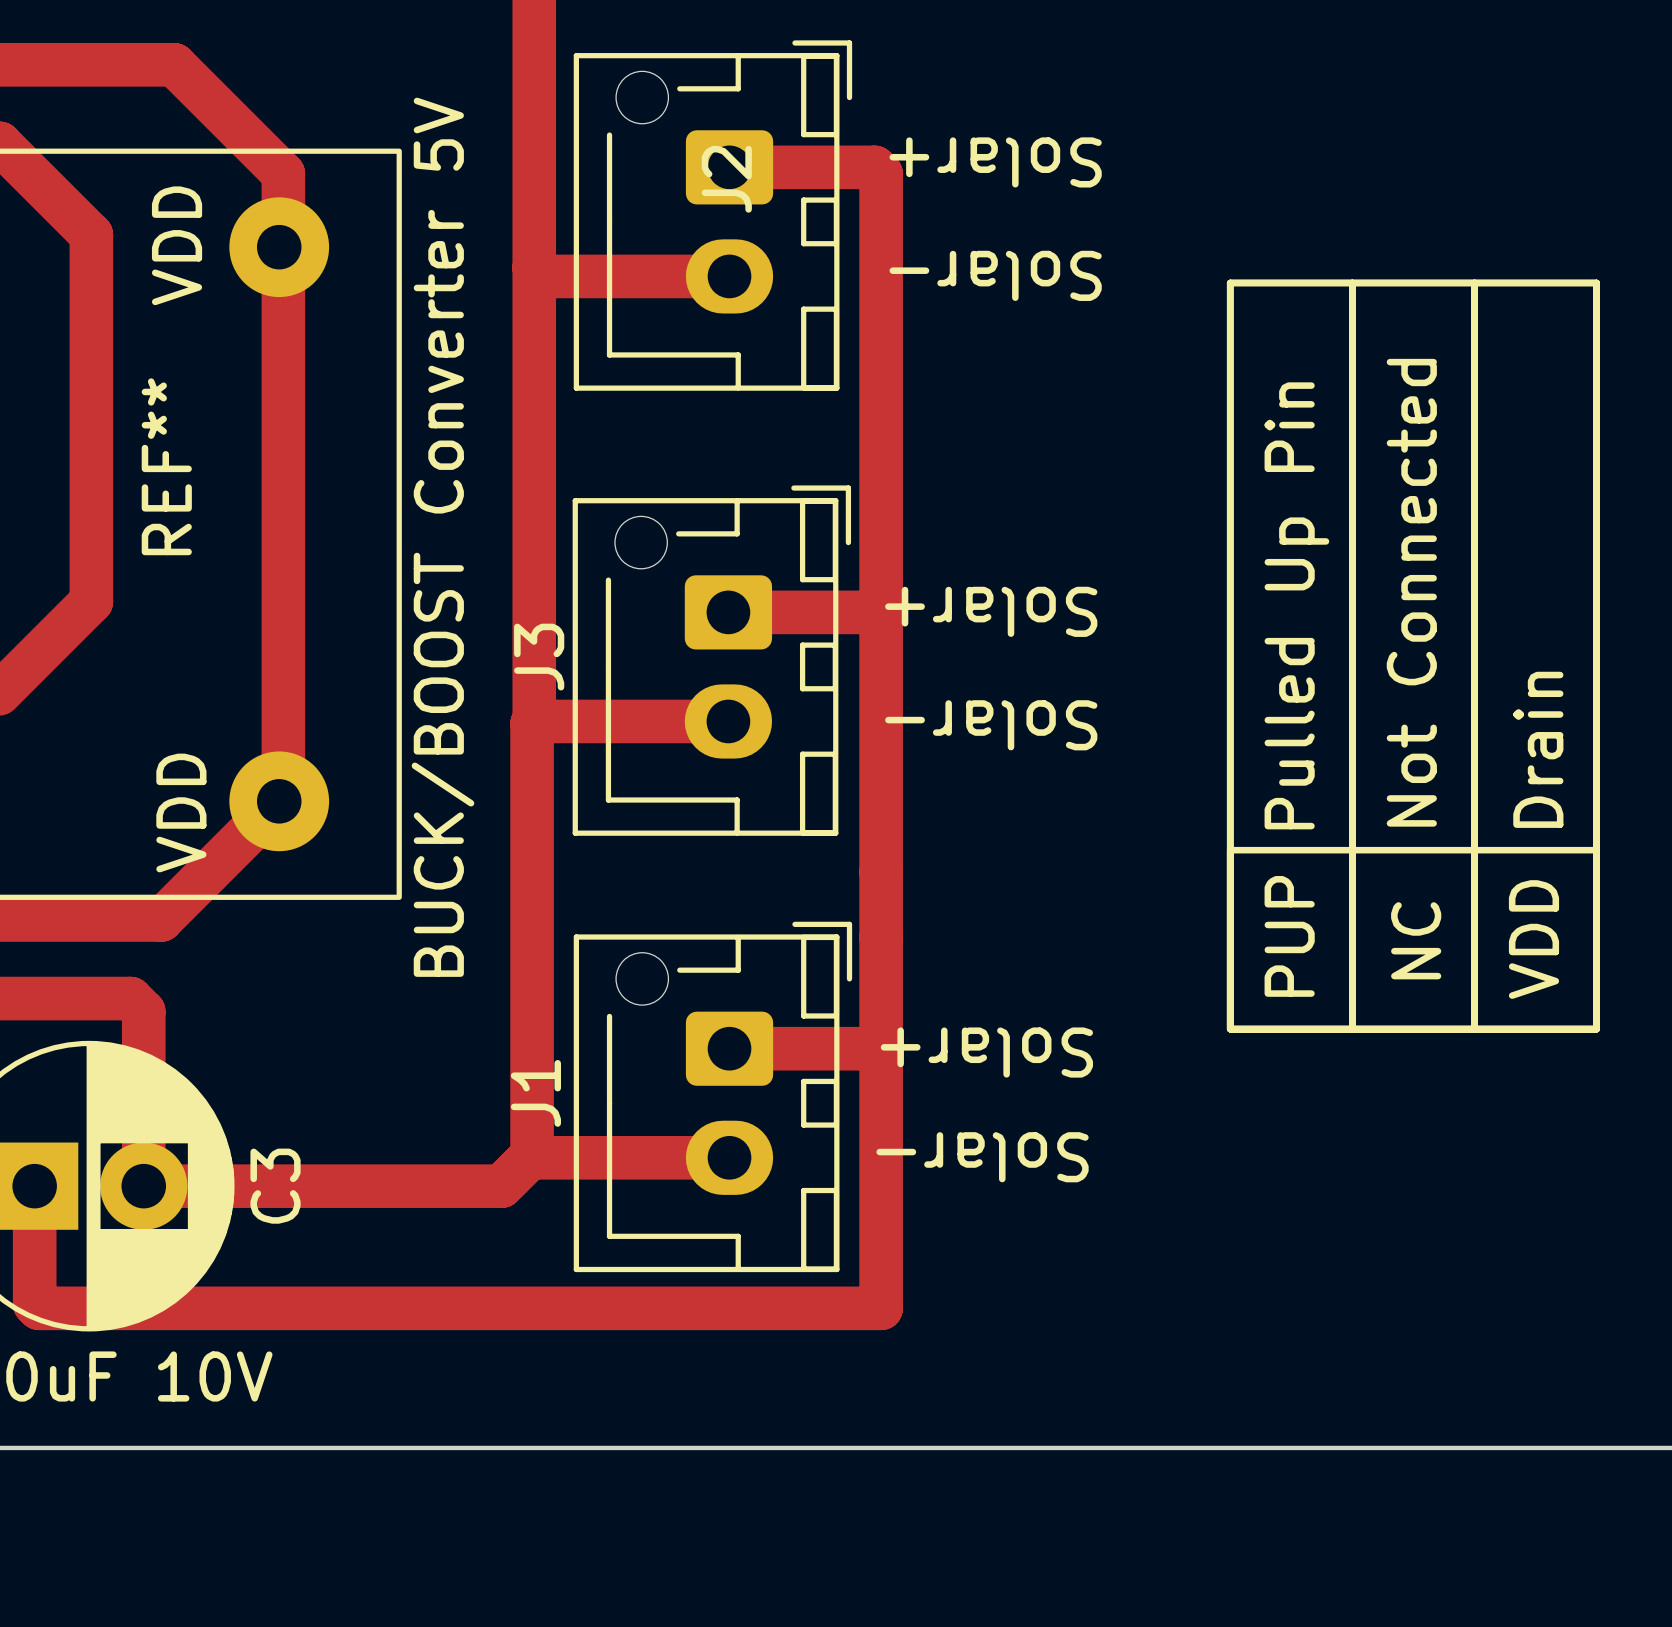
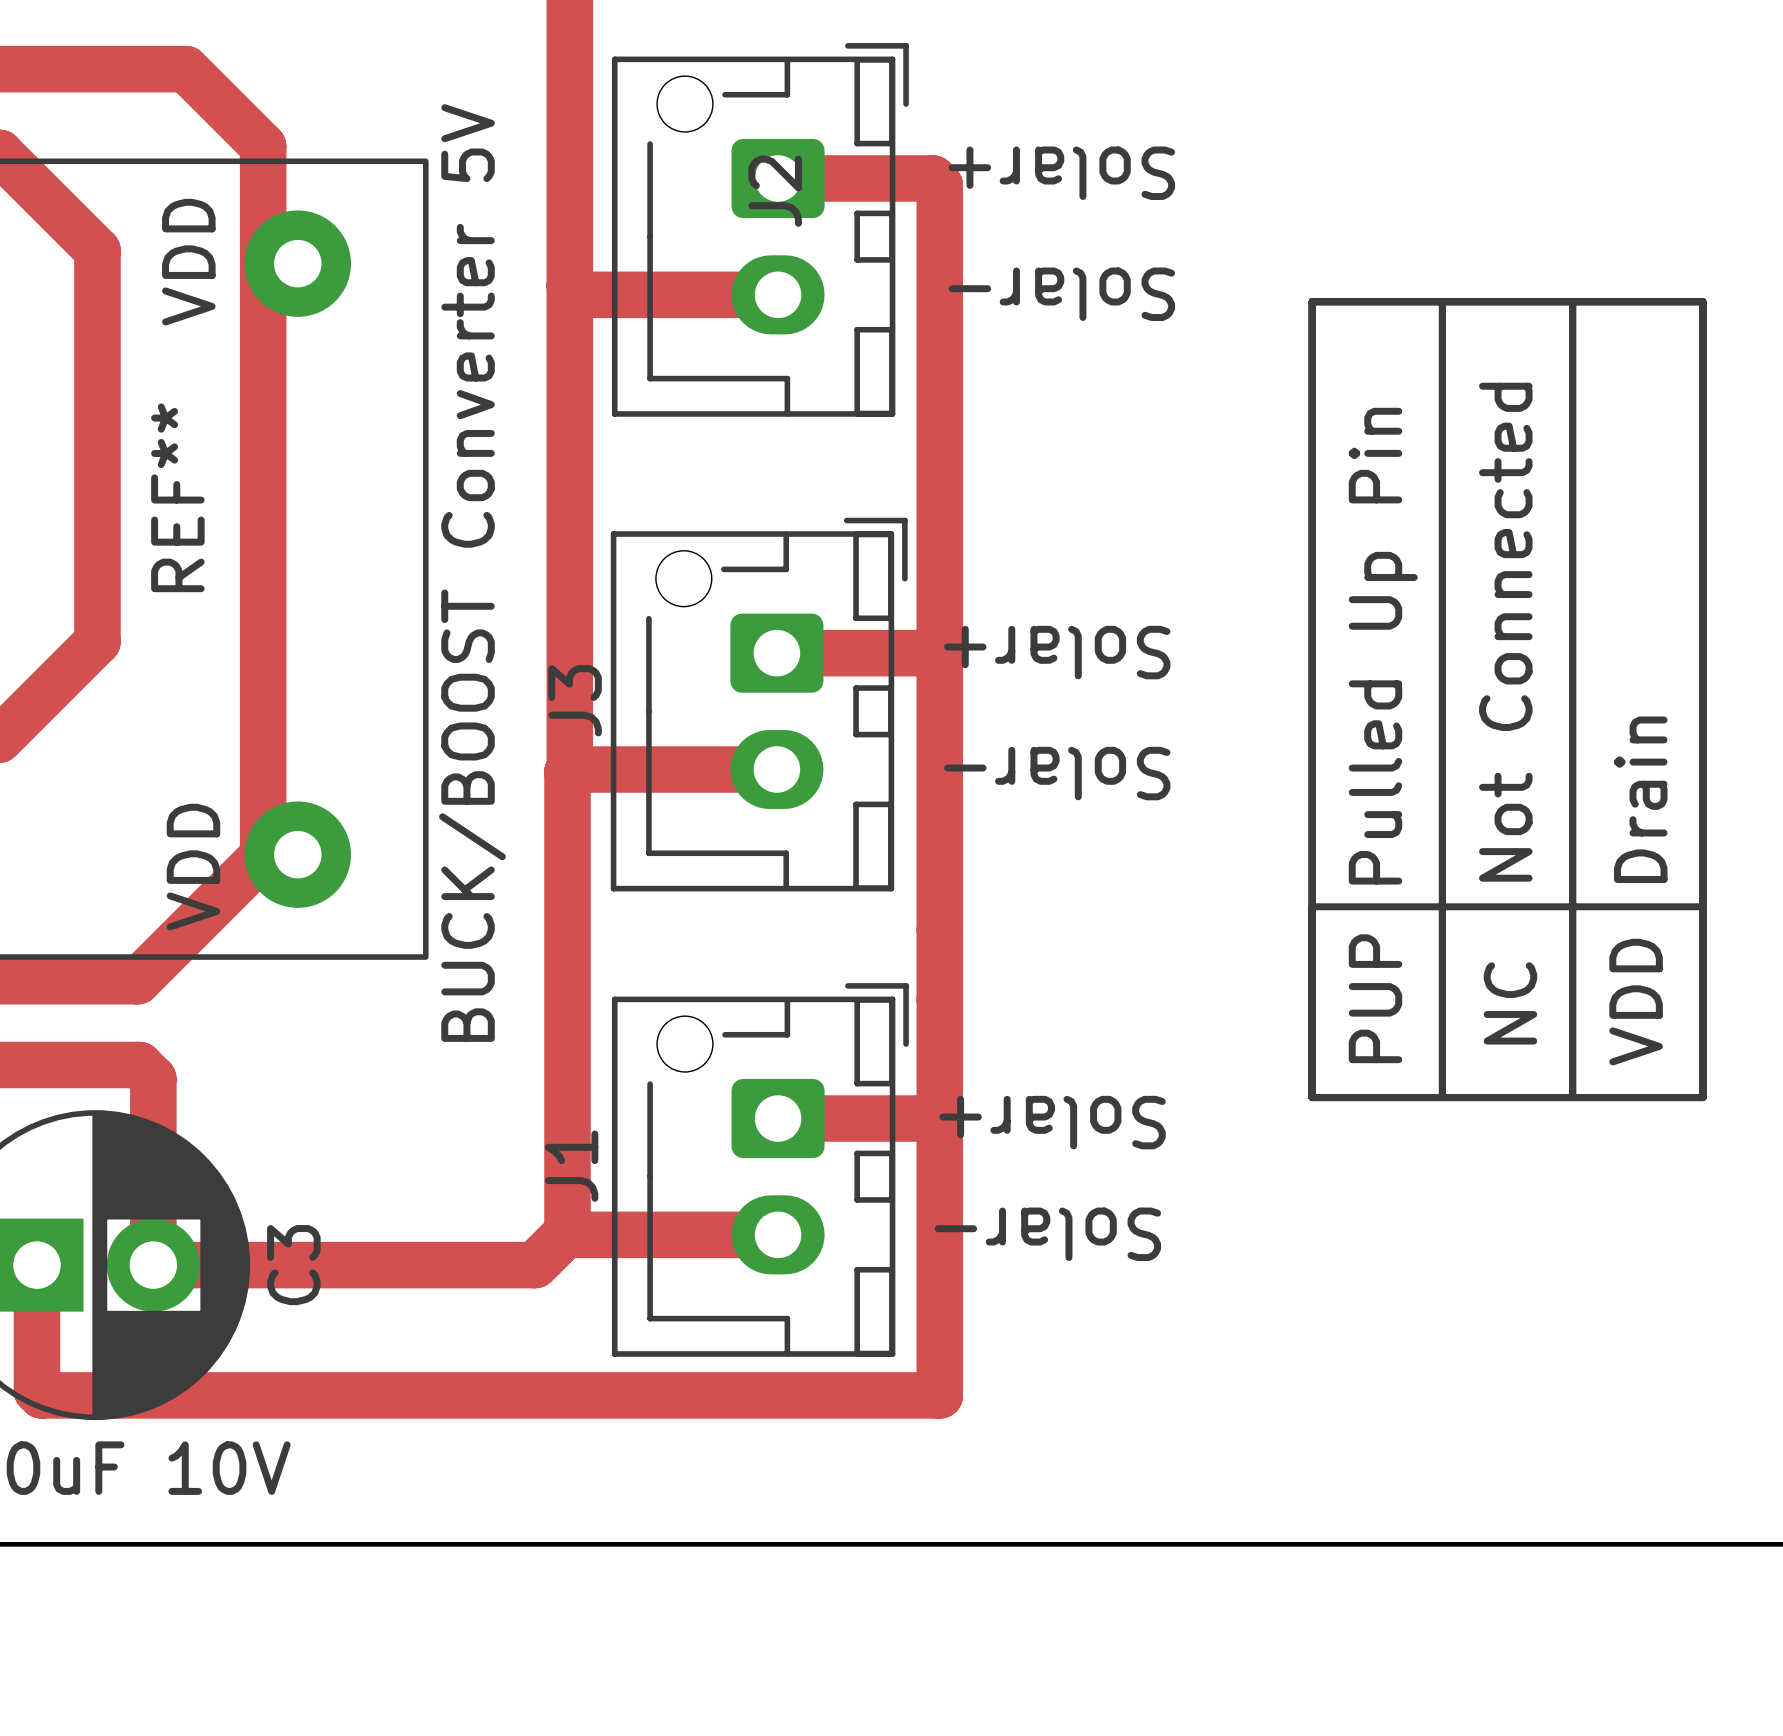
top track: (246, 137) (283, 173) (283, 797) (161, 920) (128, 920) -> (263, 146) (263, 855) (137, 981)

